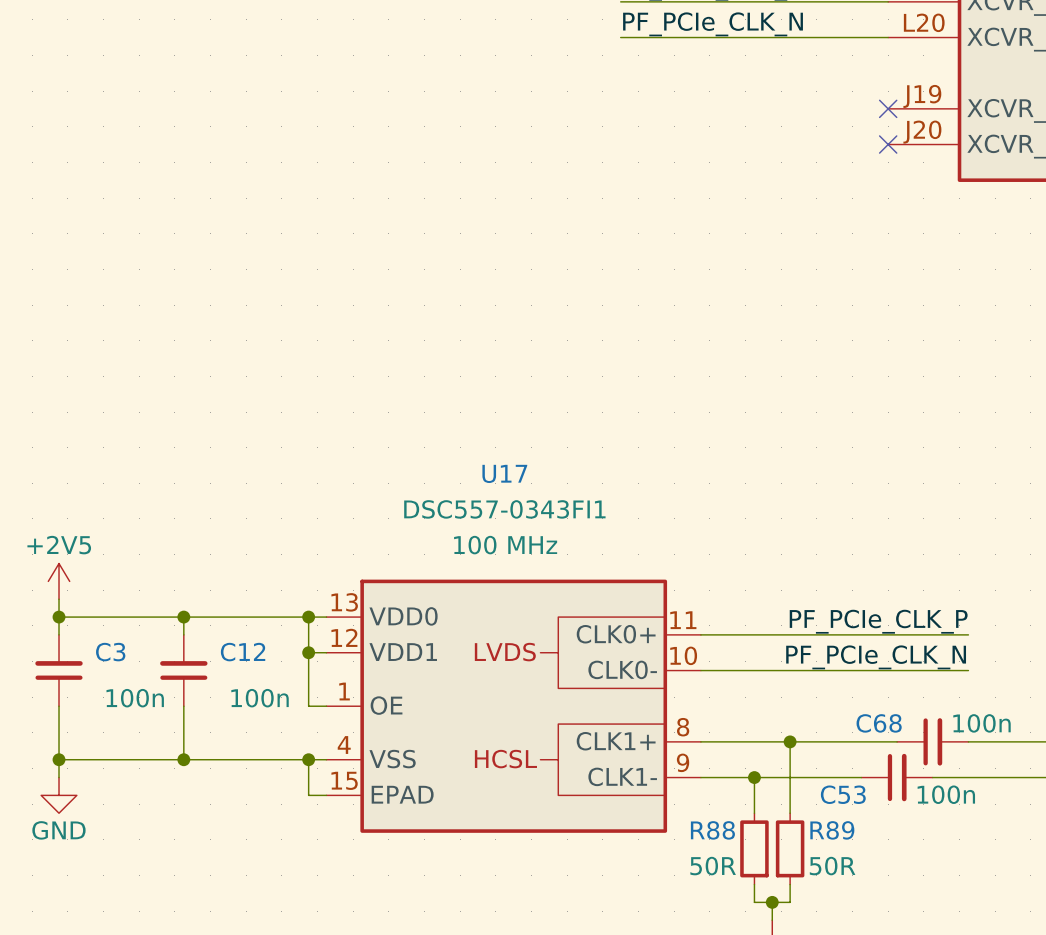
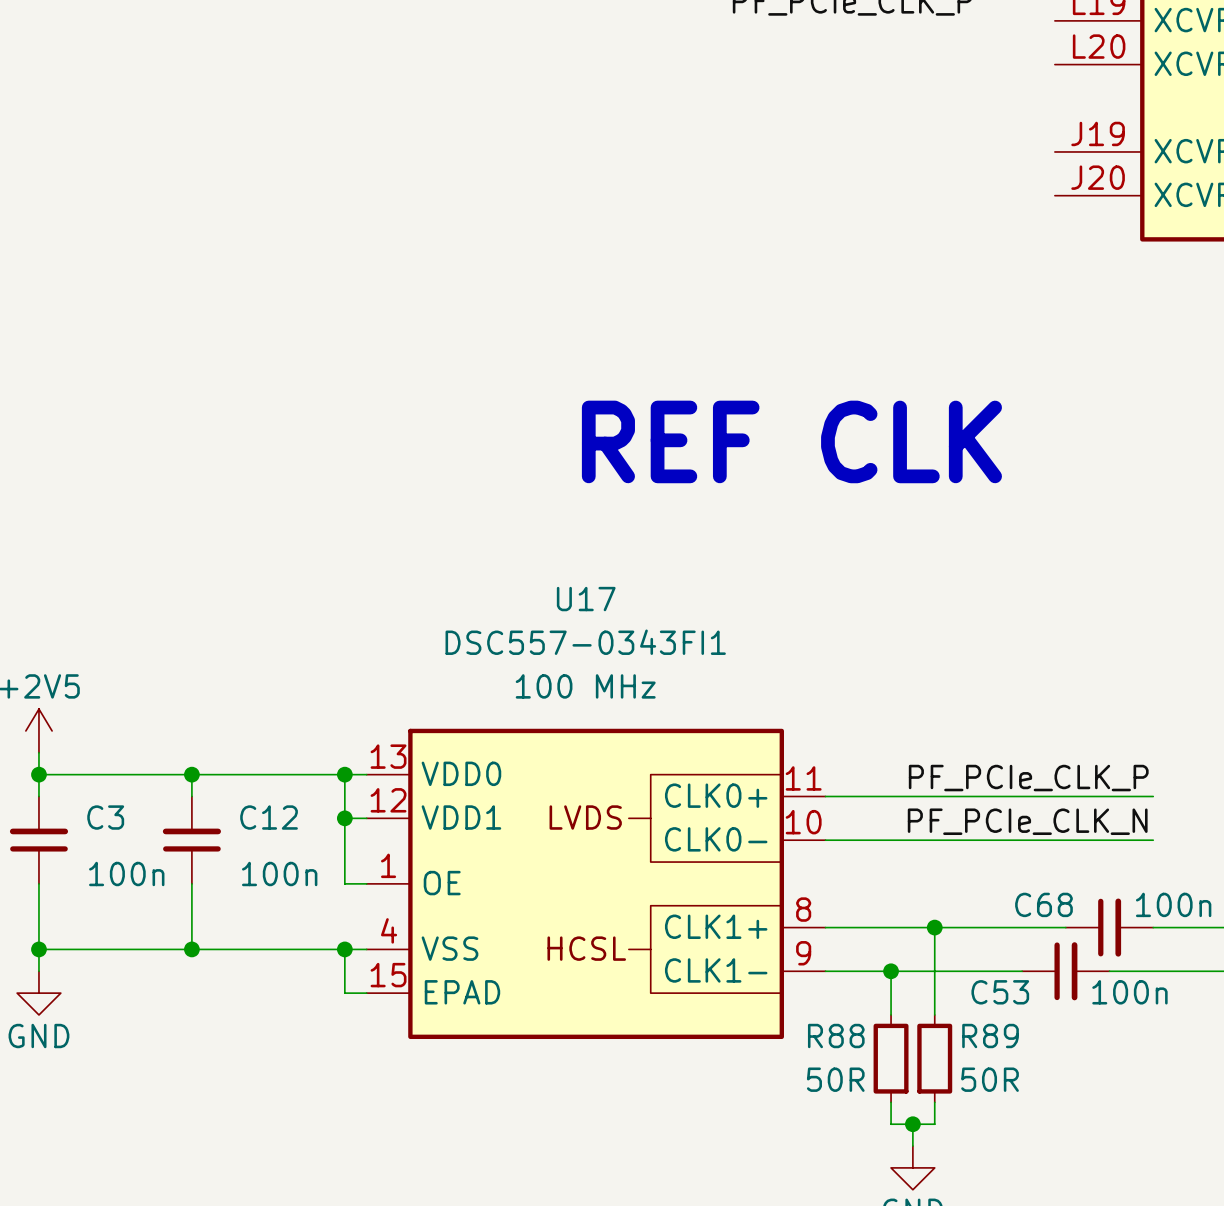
wire: (620, 1) (888, 1) -> none
label: PF_PCIe_CLK_N (713, 24) -> none
wire: (620, 37) (888, 37) -> none
no-connect mark: (888, 108) -> none
no-connect mark: (888, 144) -> none
text: none -> REF CLK (791, 441)

